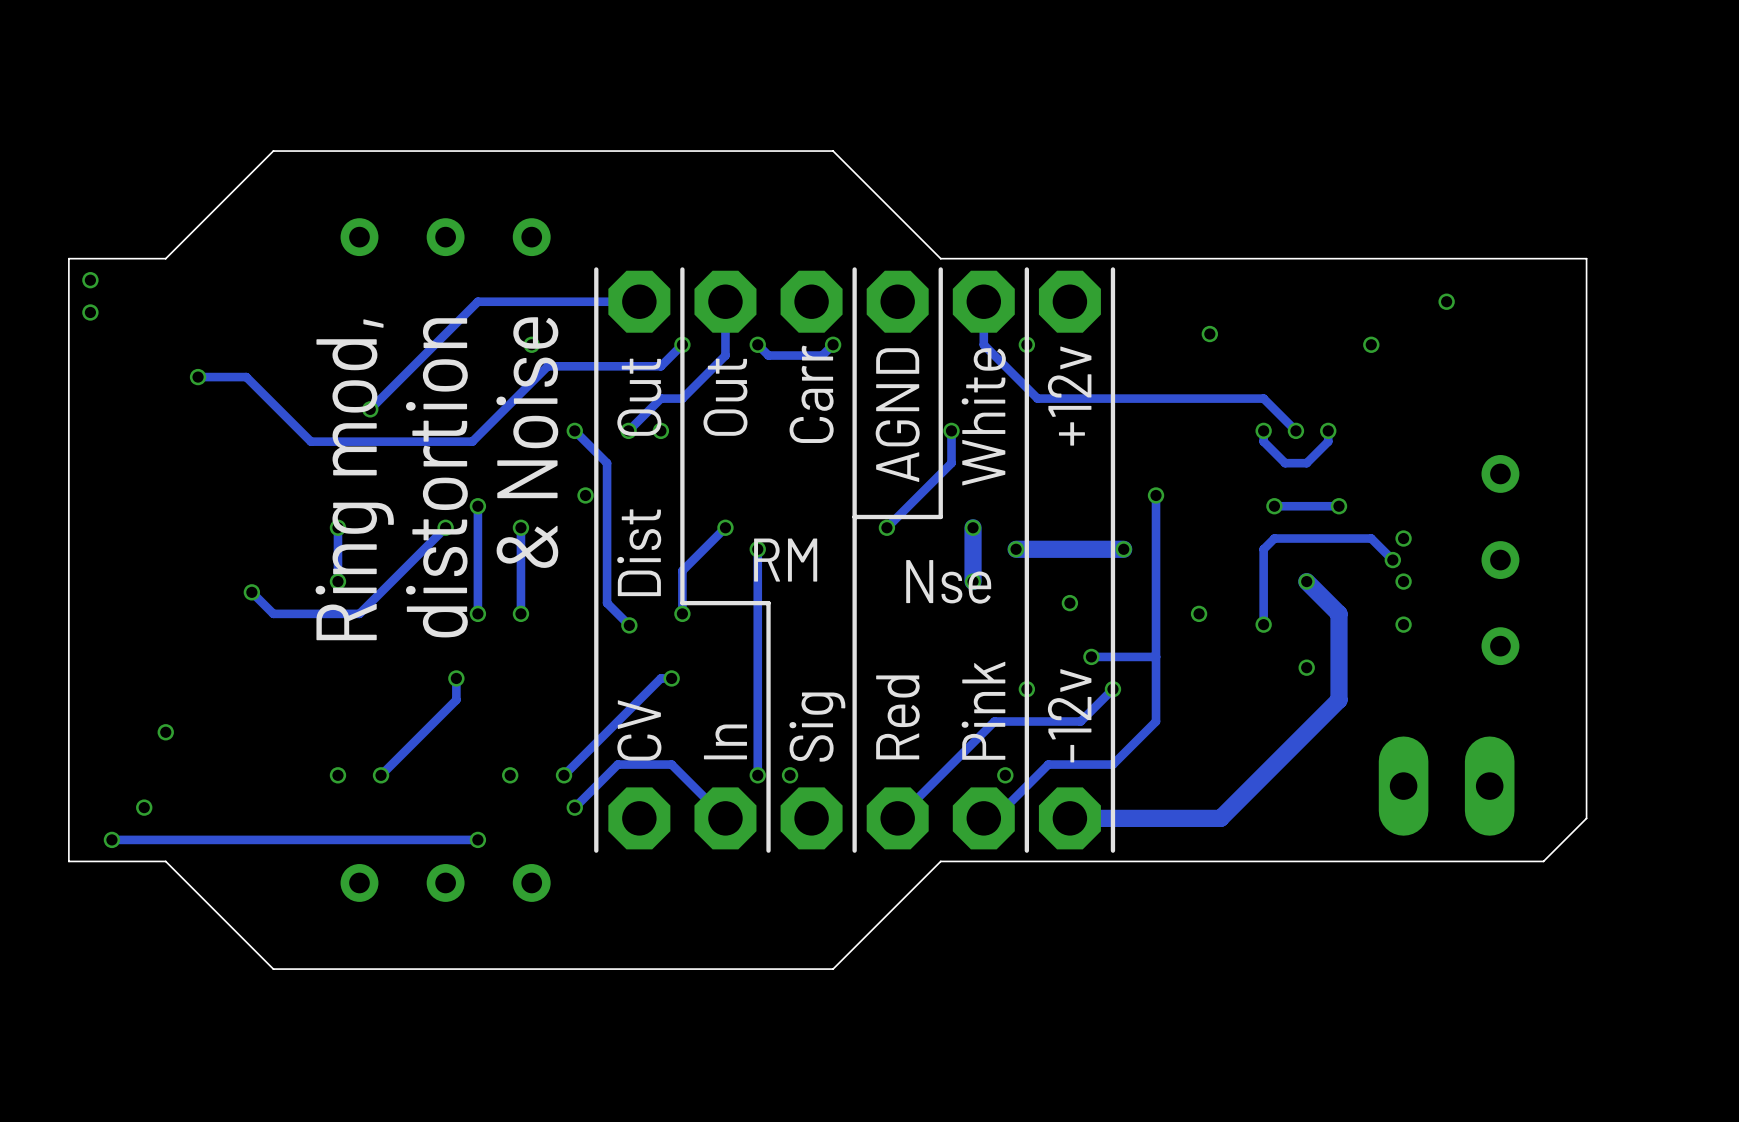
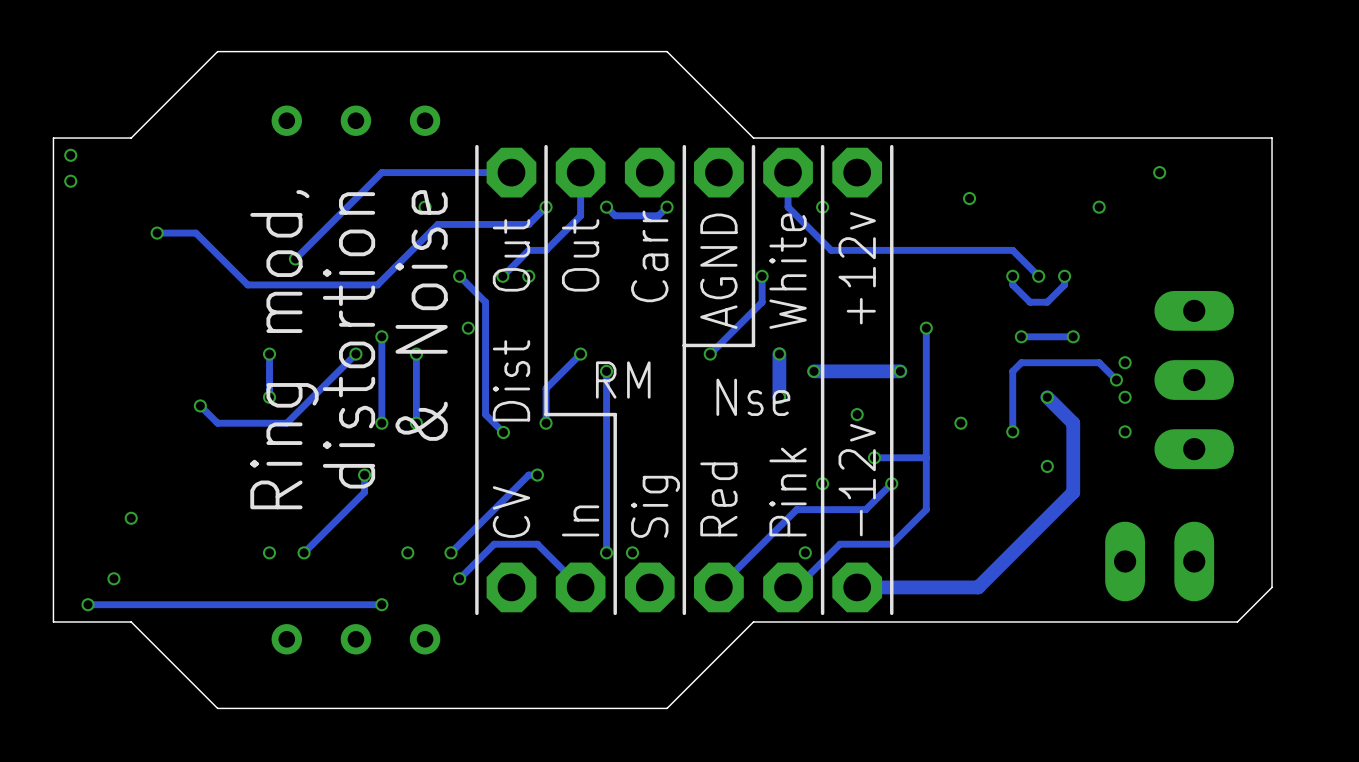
part footprint: [1481, 455, 1520, 666] -> [1154, 290, 1235, 470]

